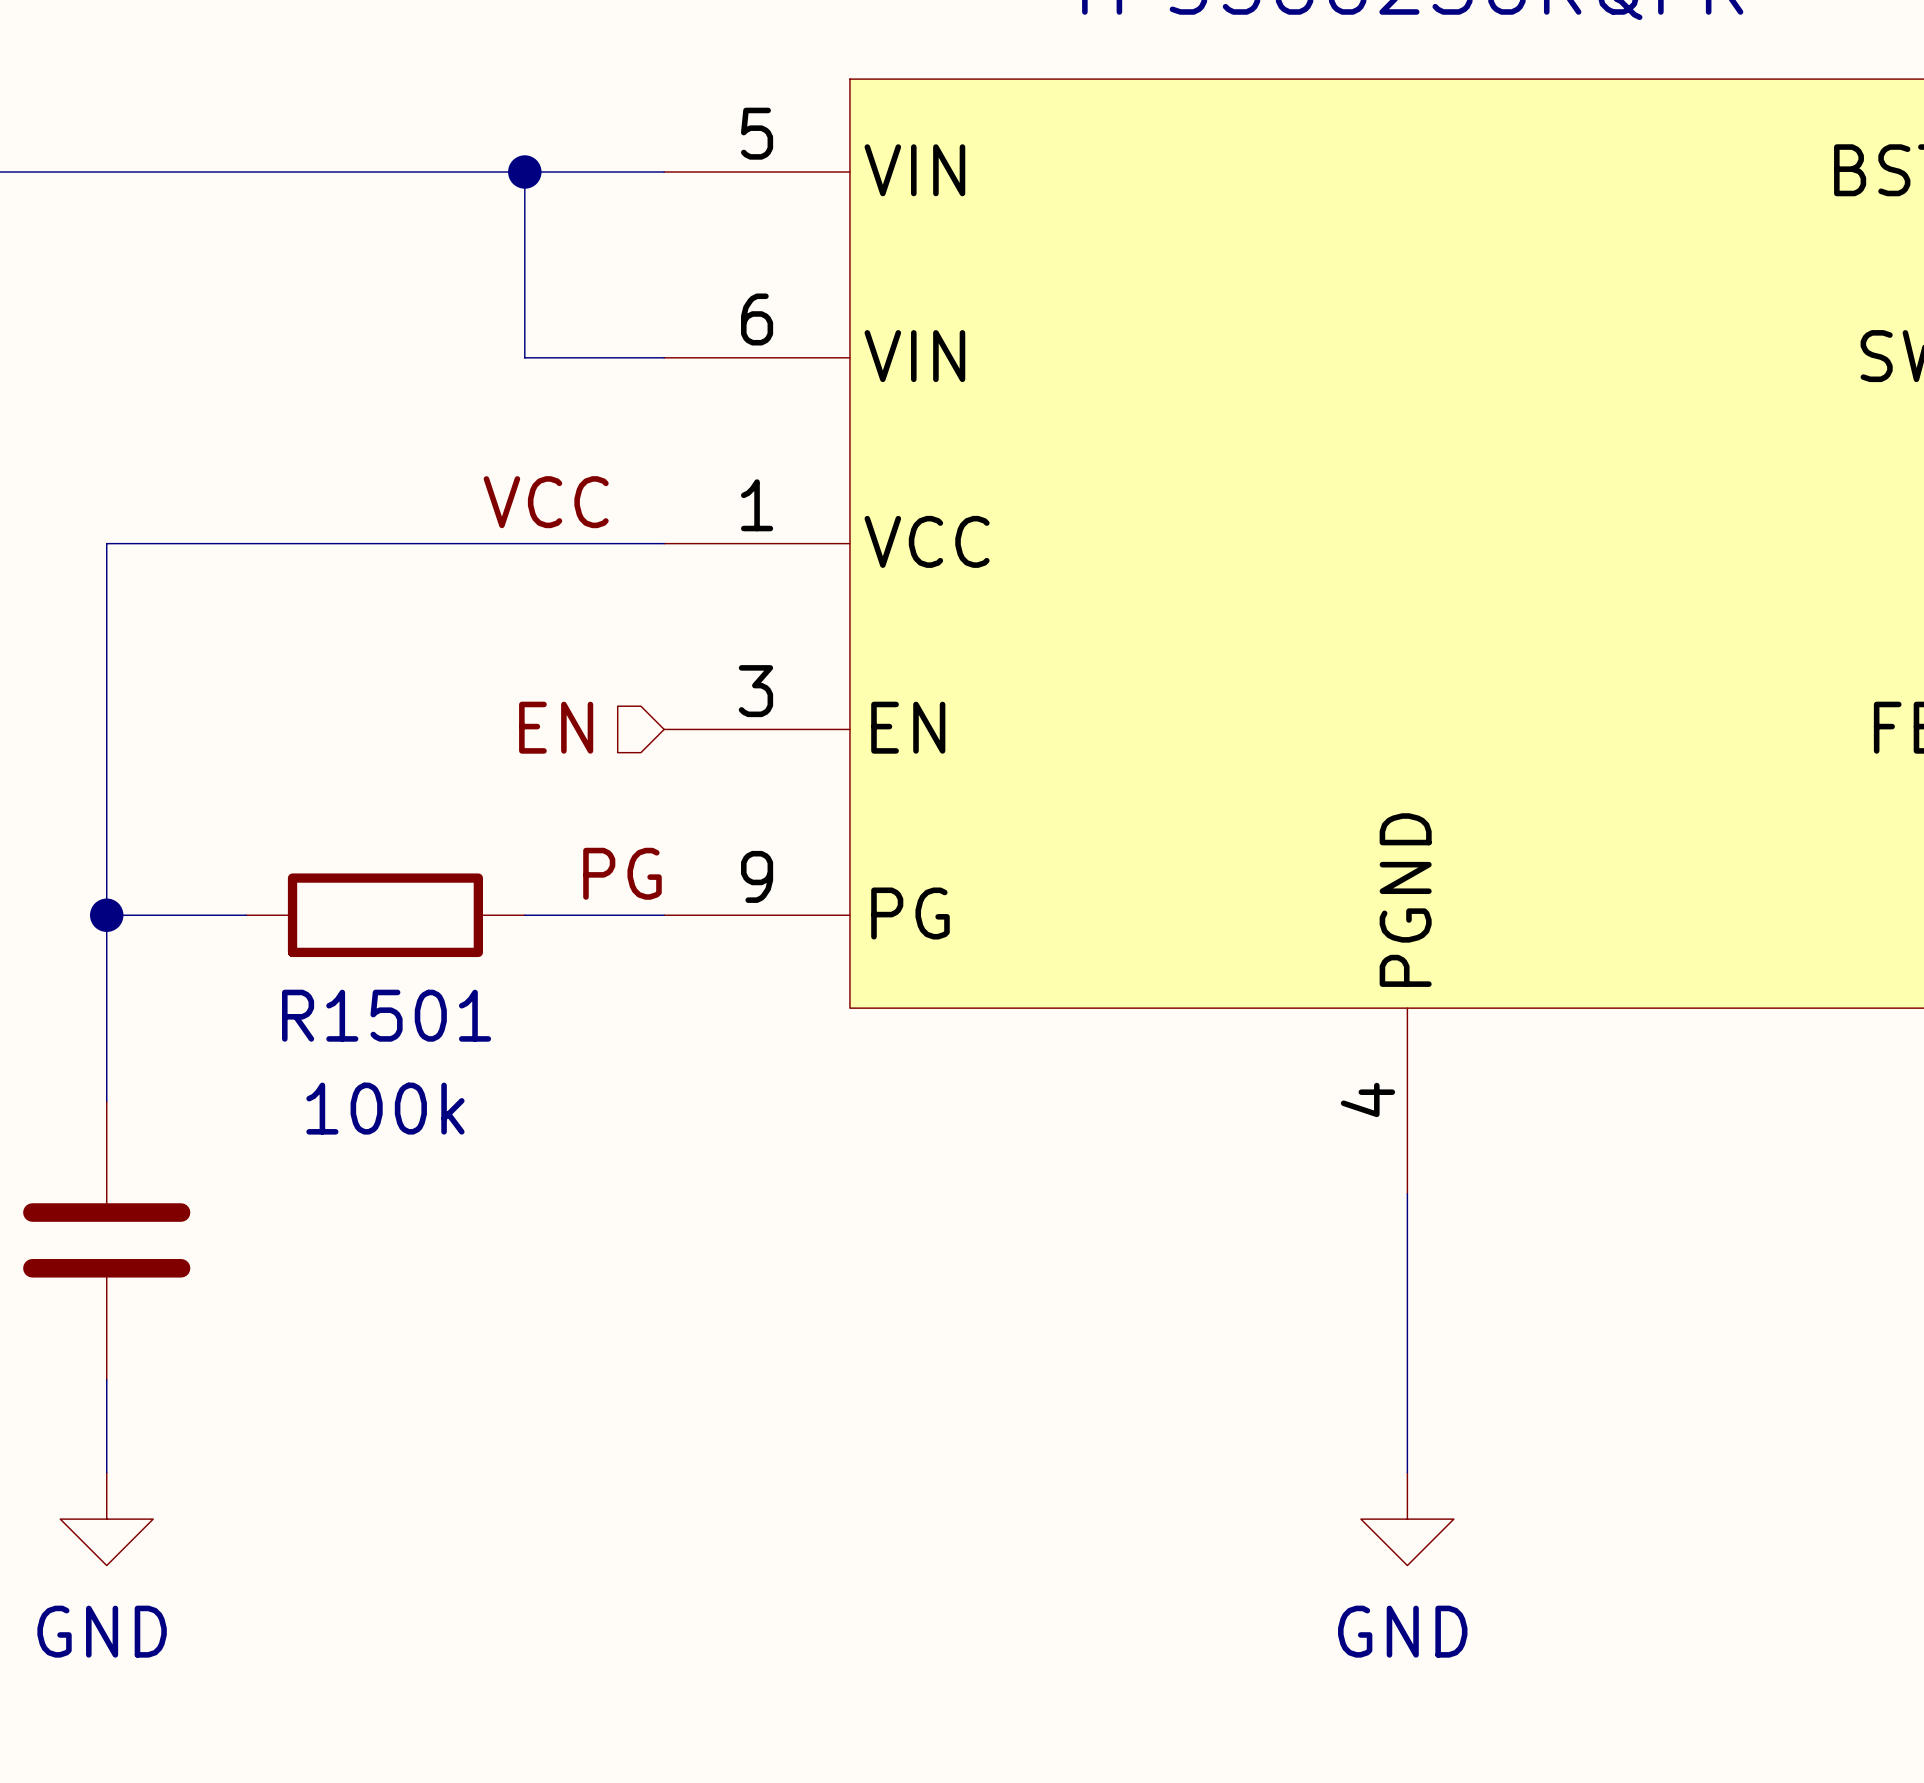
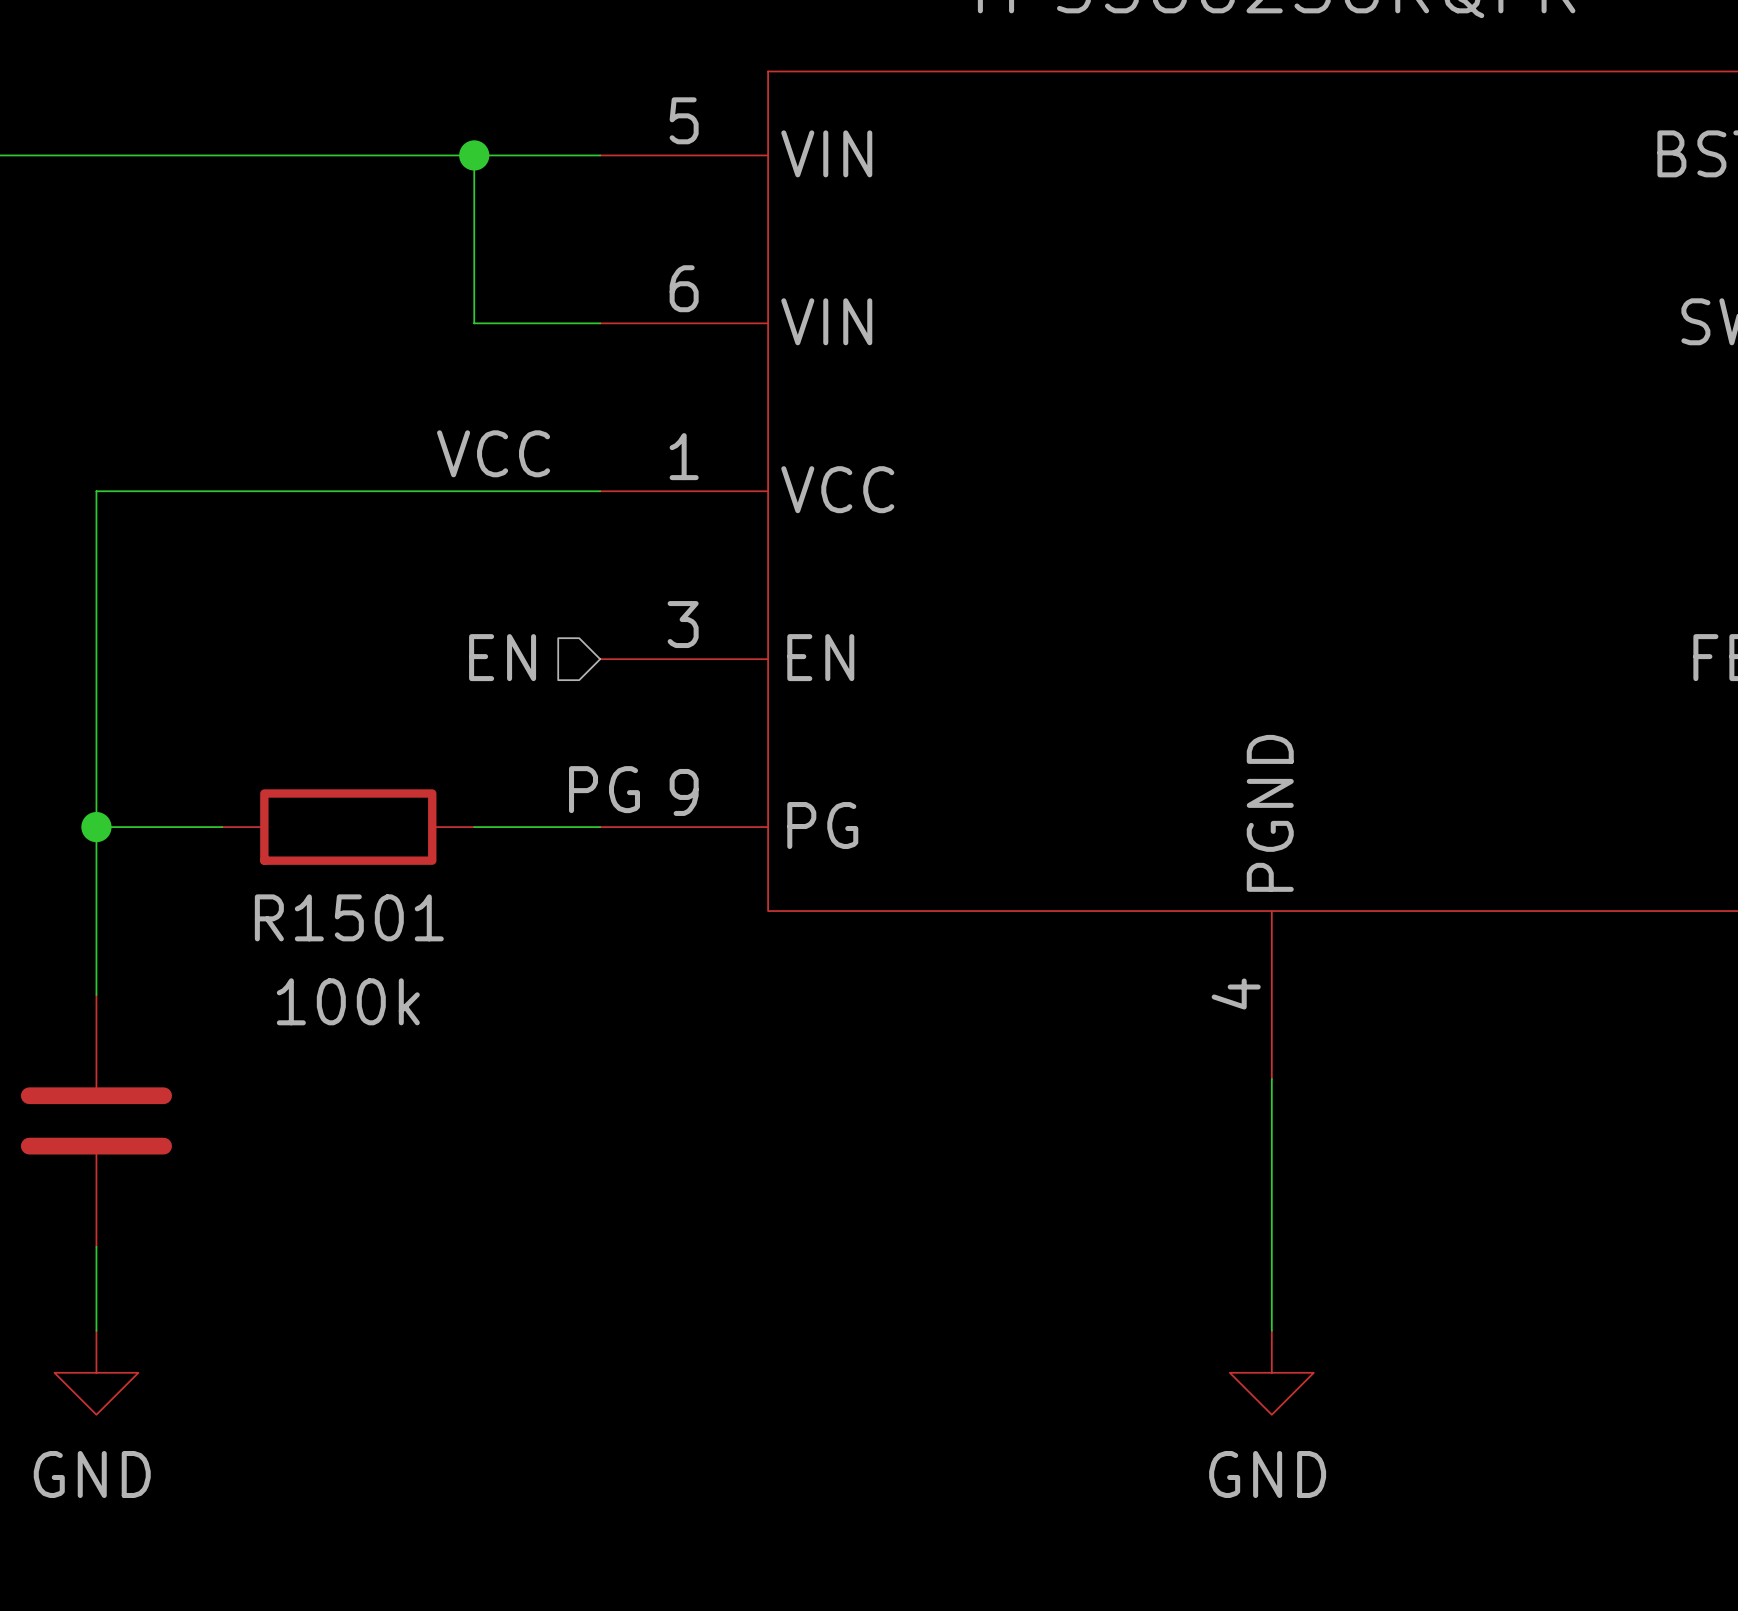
label position: PG (622, 873) -> PG (604, 789)

